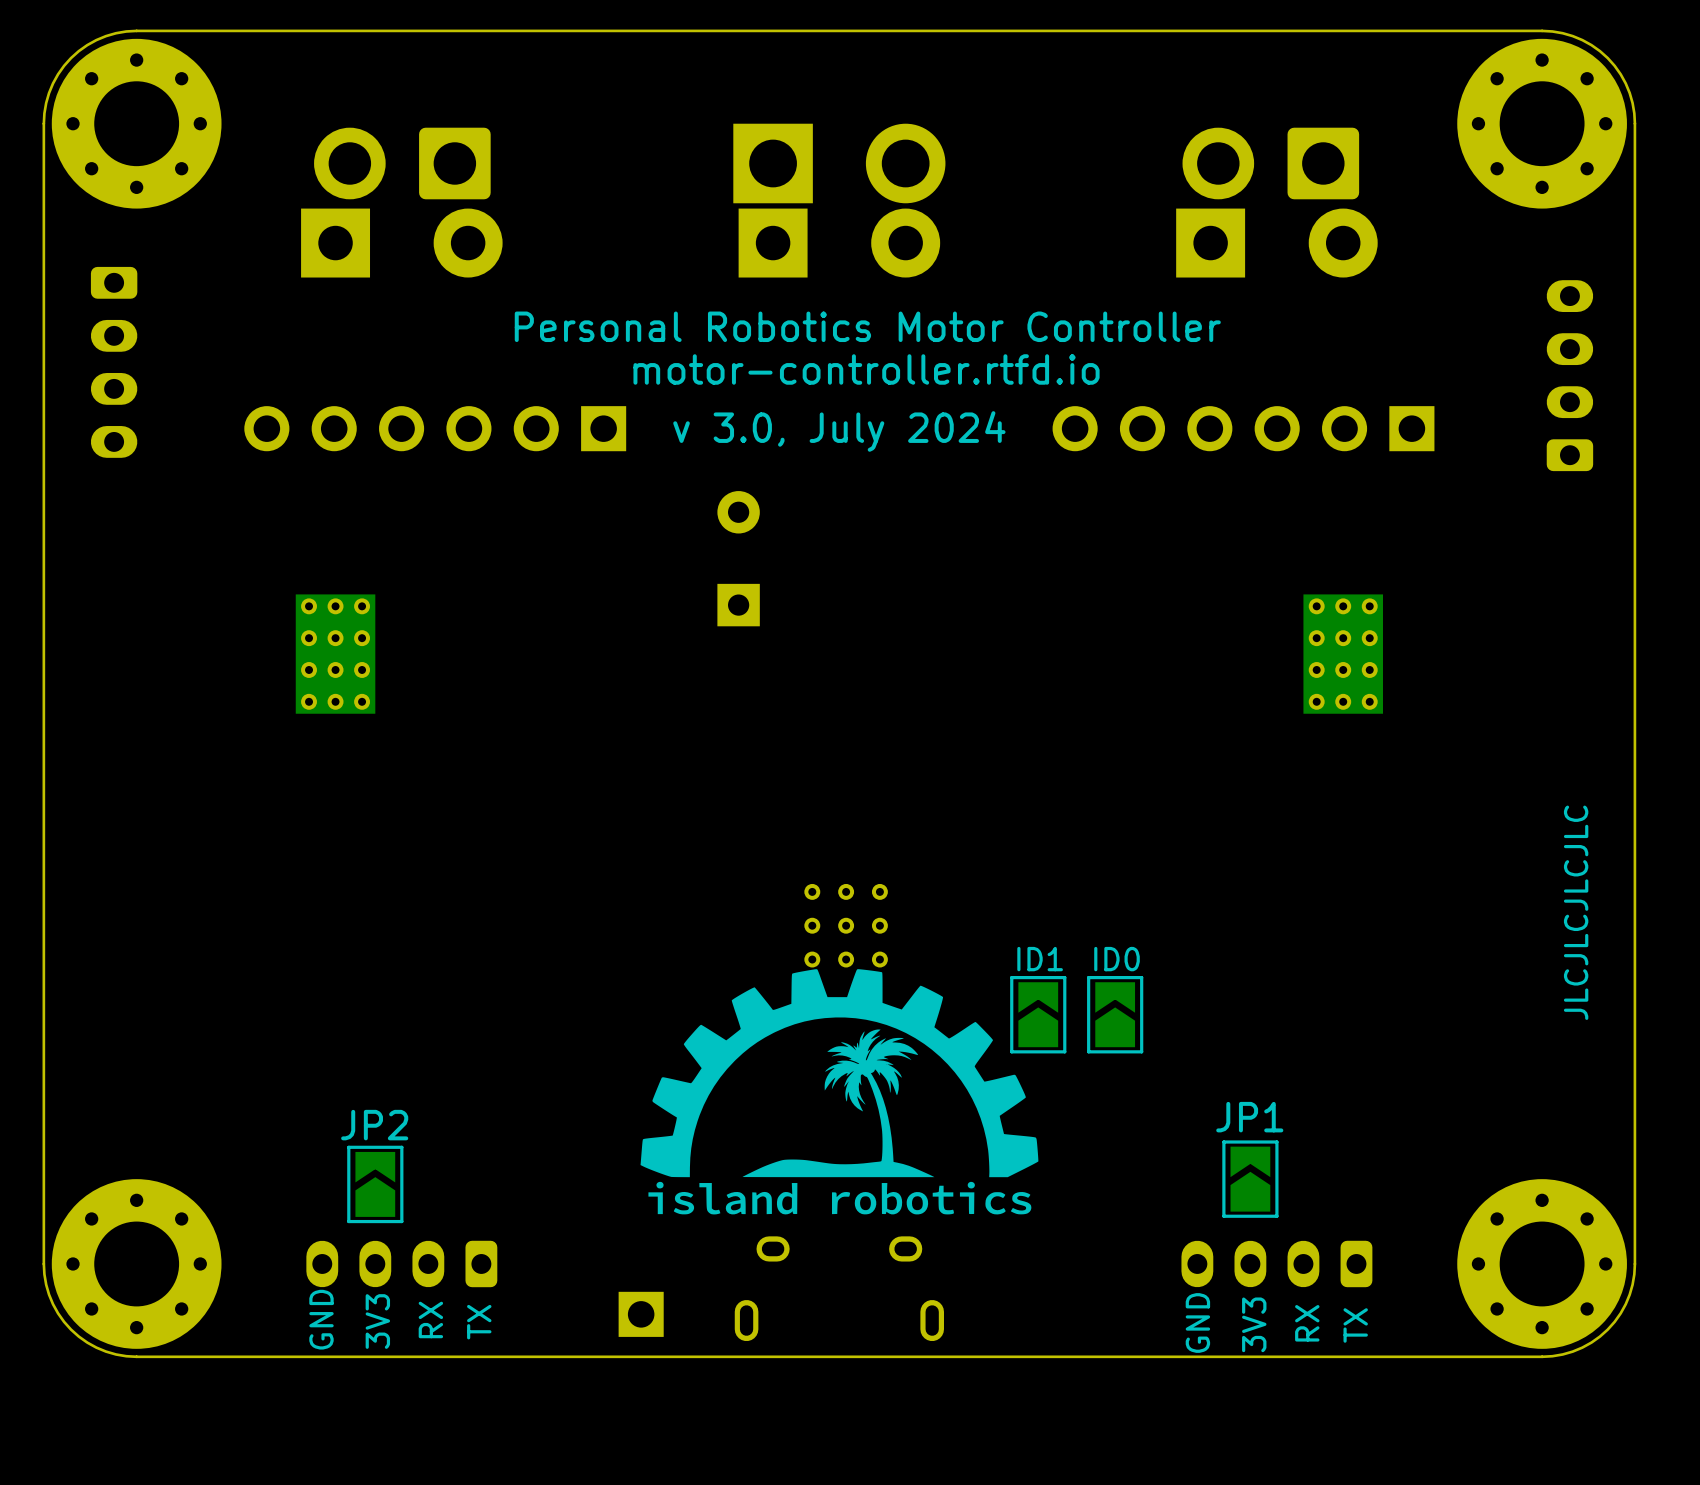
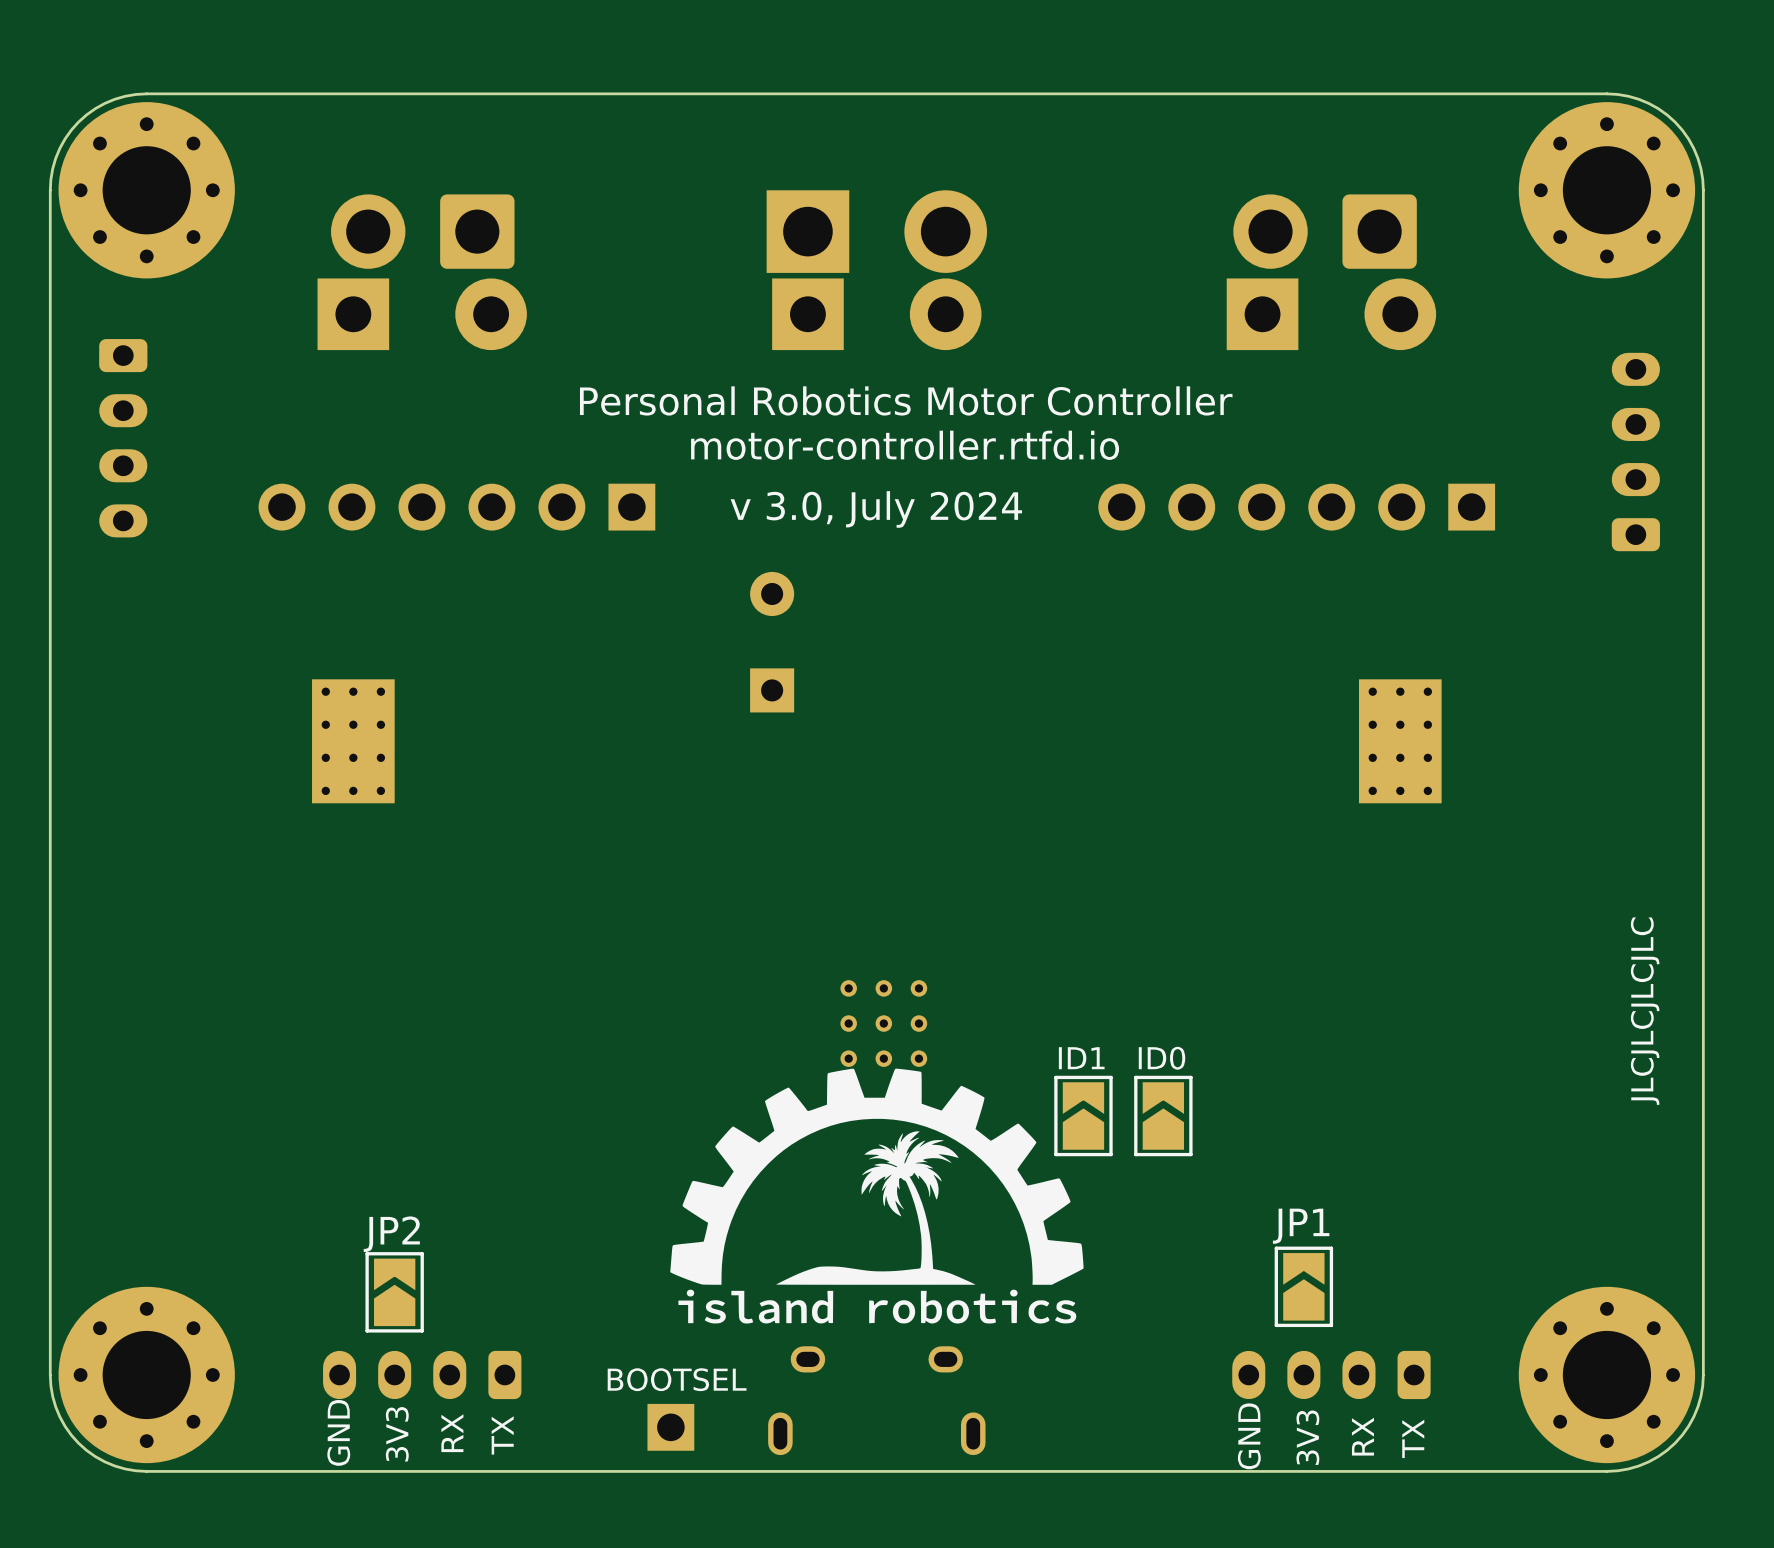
text: none -> BOOTSEL (677, 1379)

